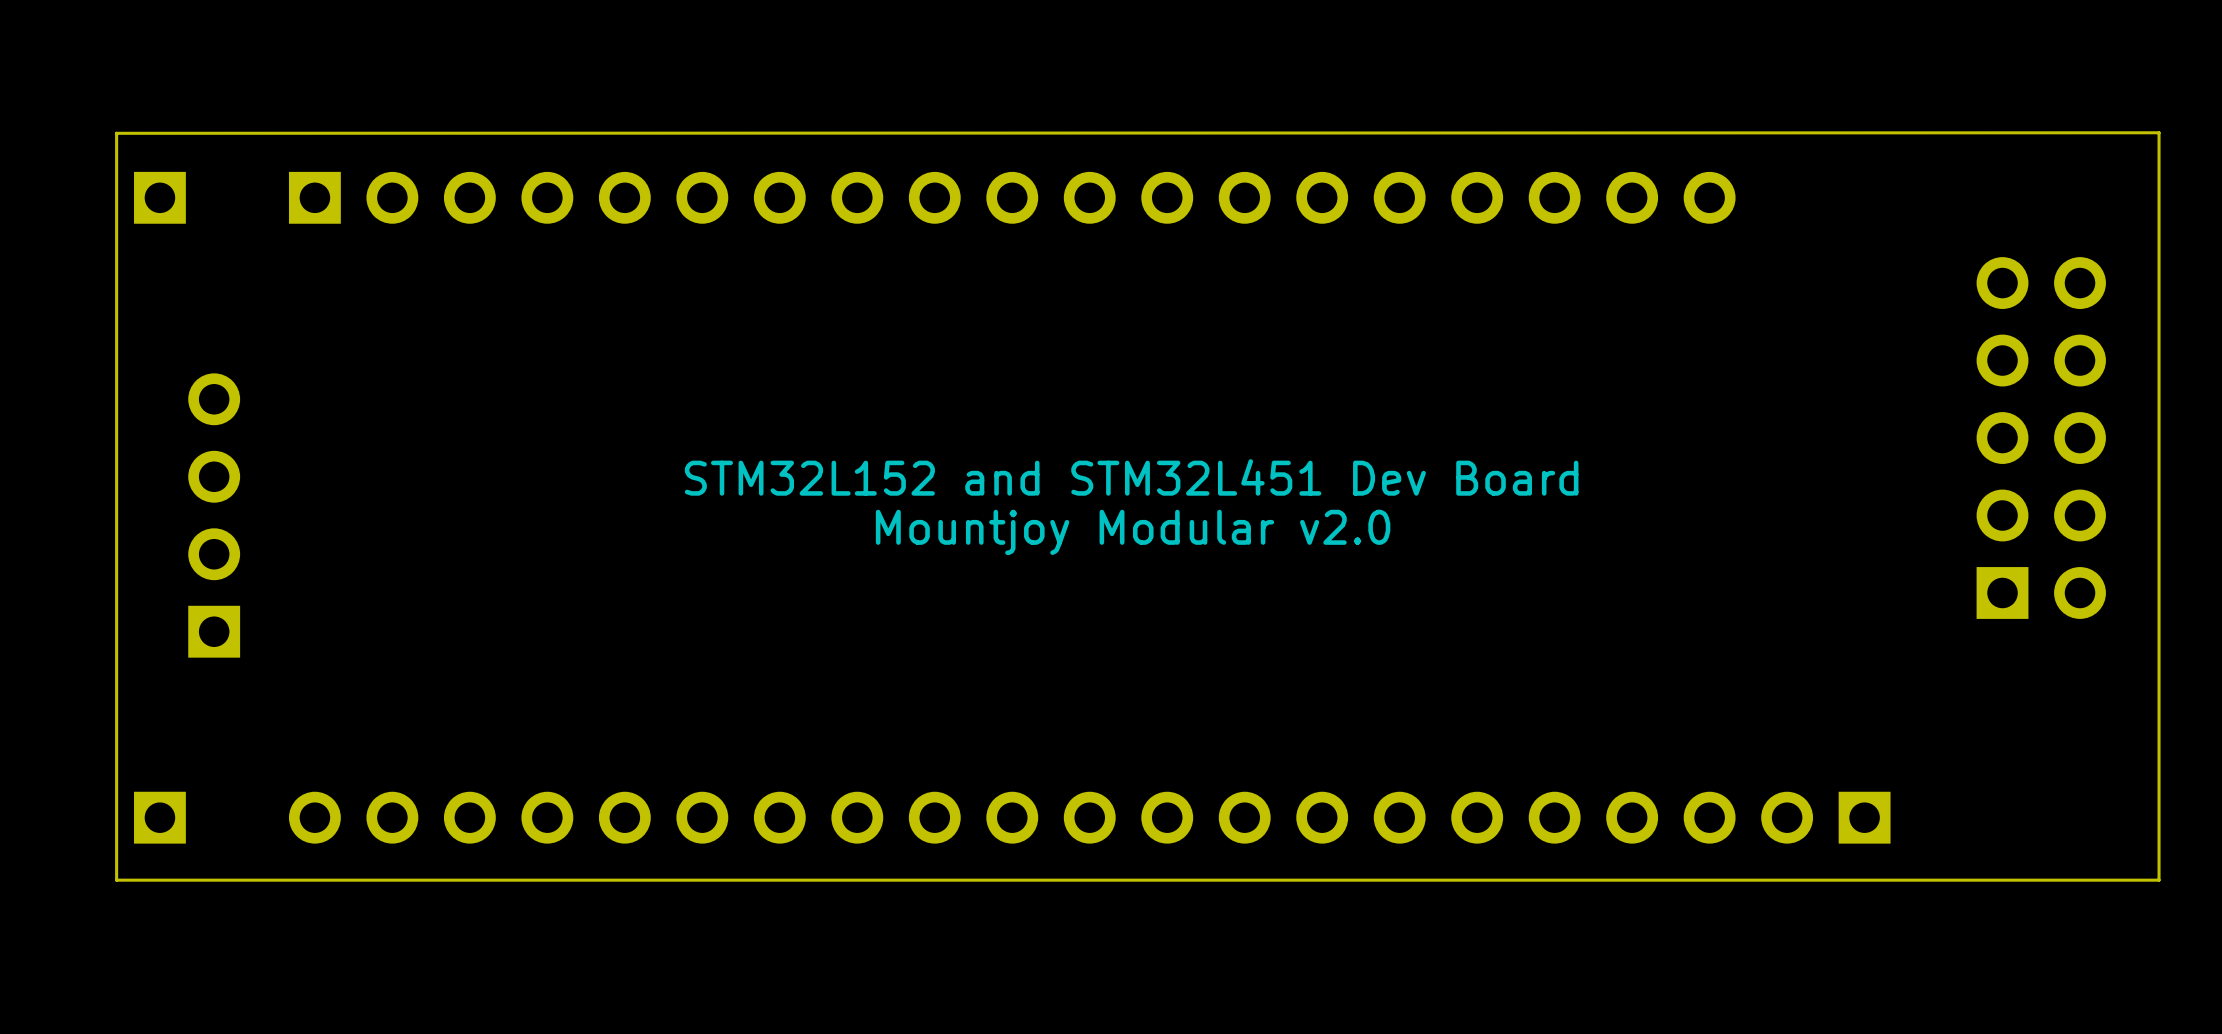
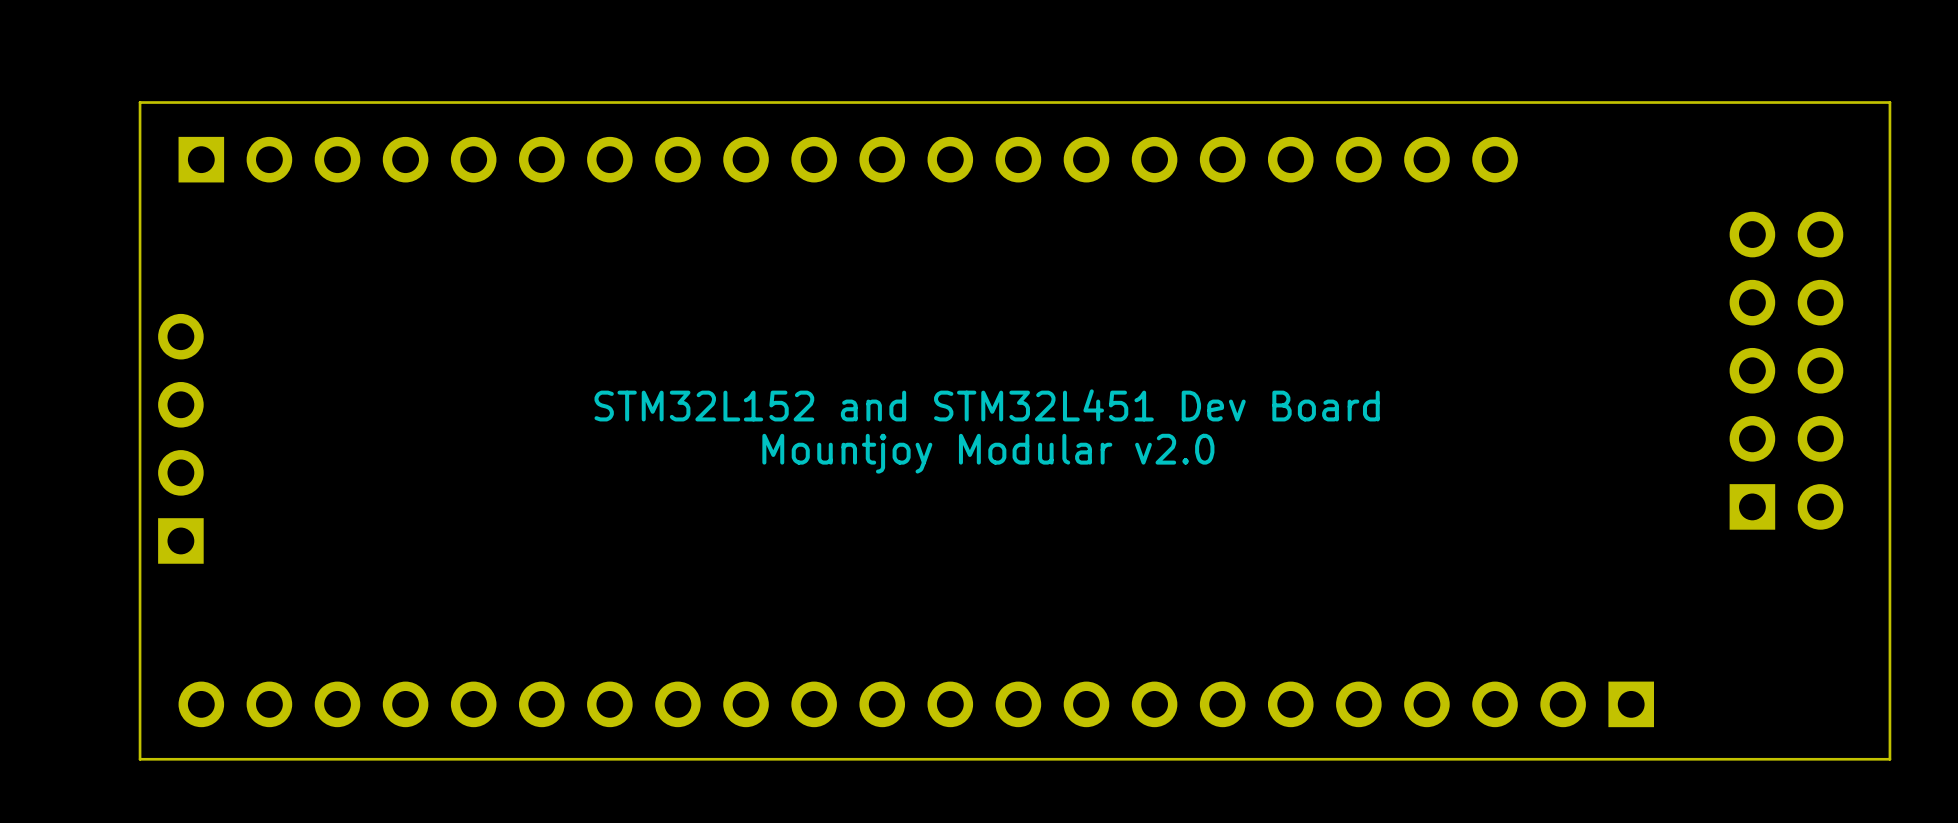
board edge: (2159, 132) (116, 133) (116, 880) (167, 880) -> (1889, 102) (140, 102) (140, 759)
part: (159, 197) -> none
part: none -> (848, 159)
part: (1012, 197) -> none
part: (159, 817) -> none
part: none -> (916, 704)

